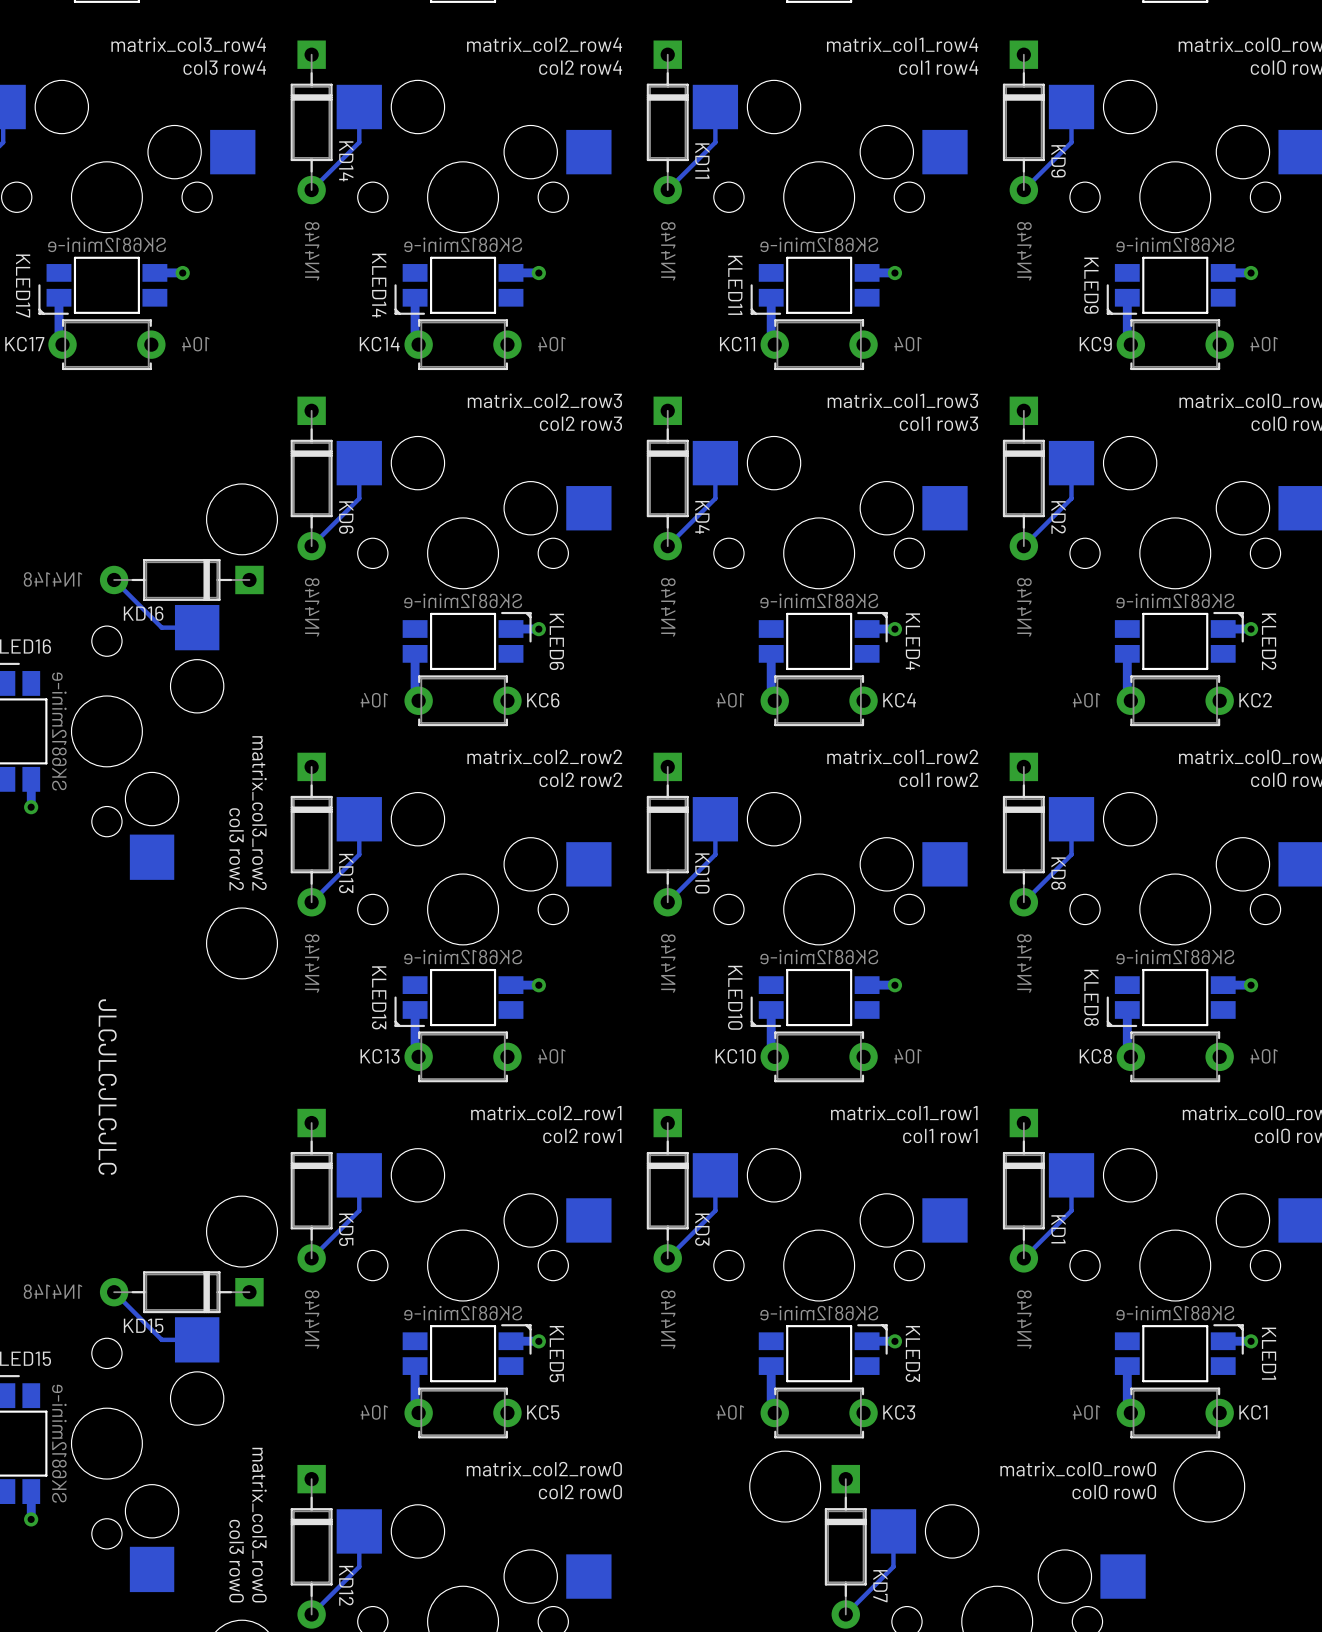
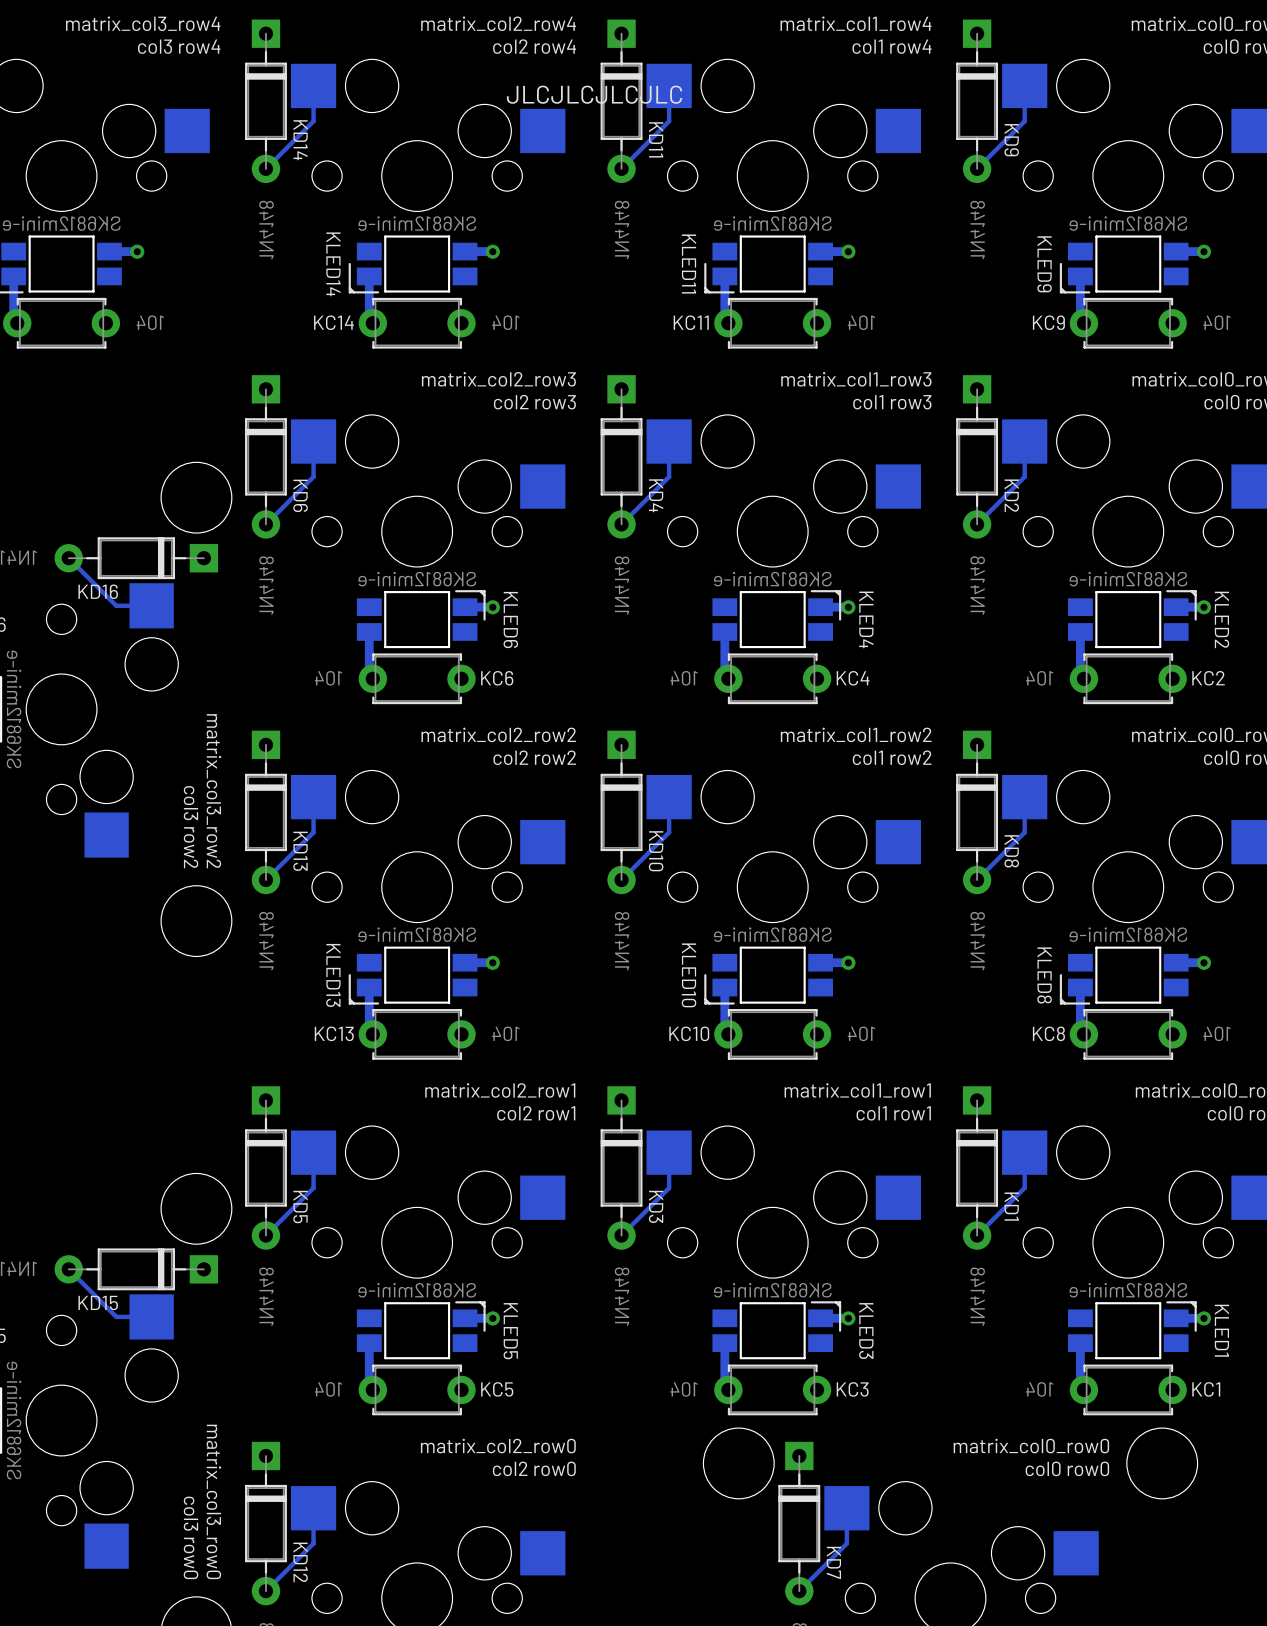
text: none -> JLCJLCJLCJLC (594, 94)
text: JLCJLCJLCJLC (107, 1087) -> none

